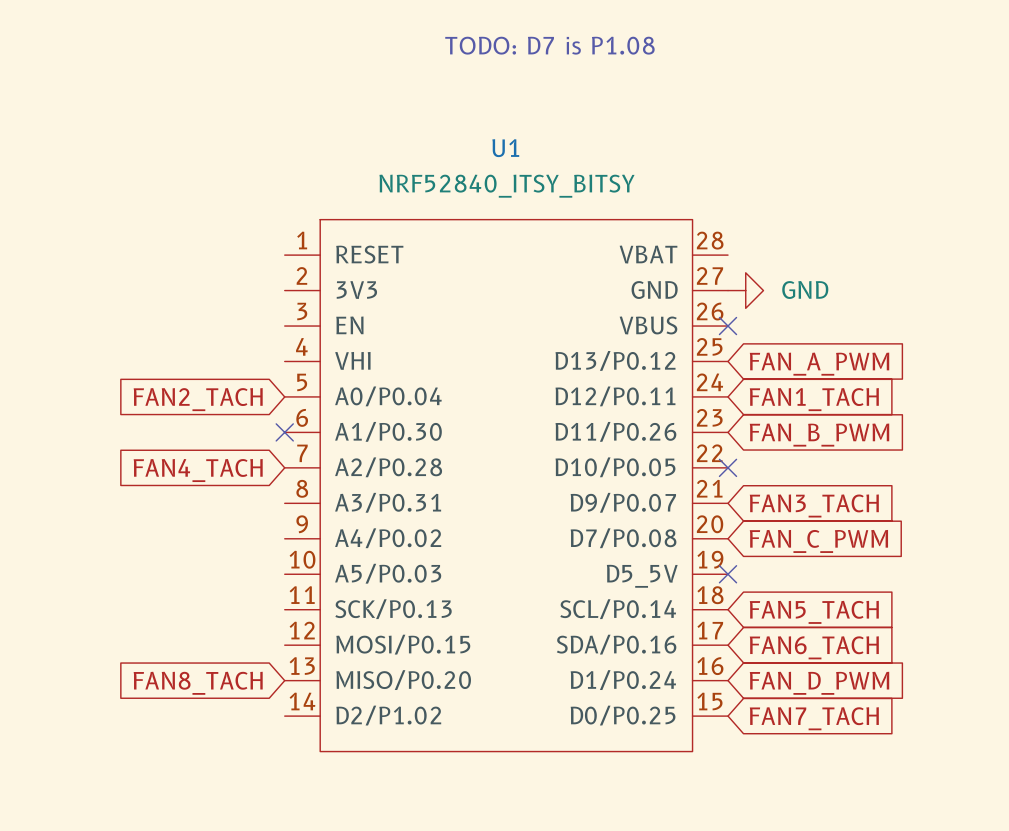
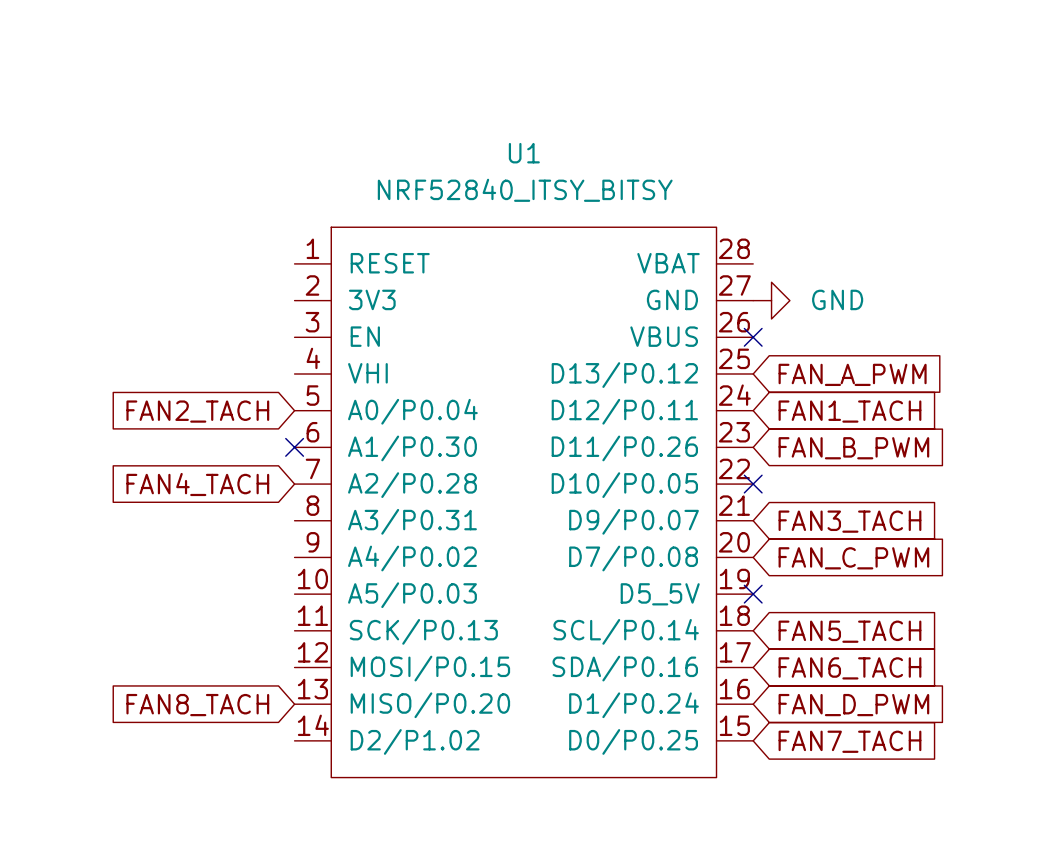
text: TODO: D7 is P1.08 (549, 45) -> none

